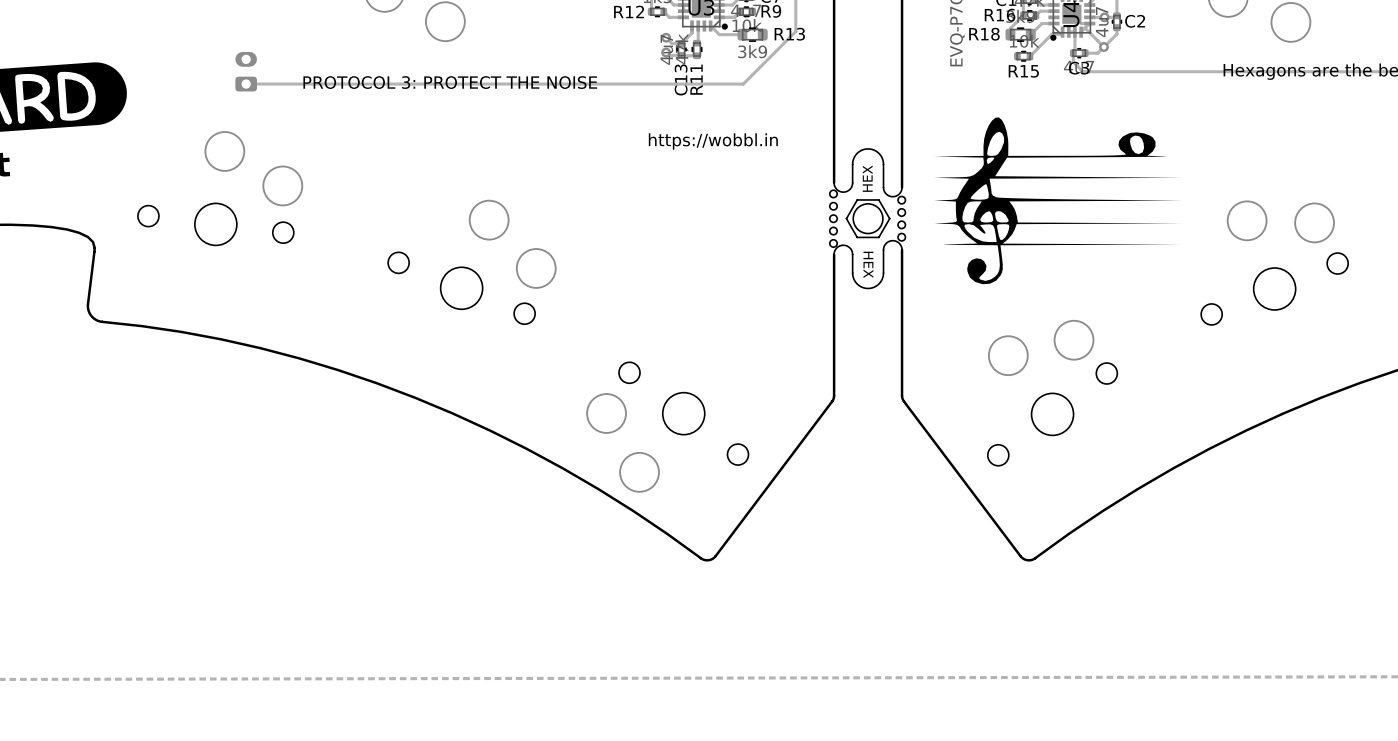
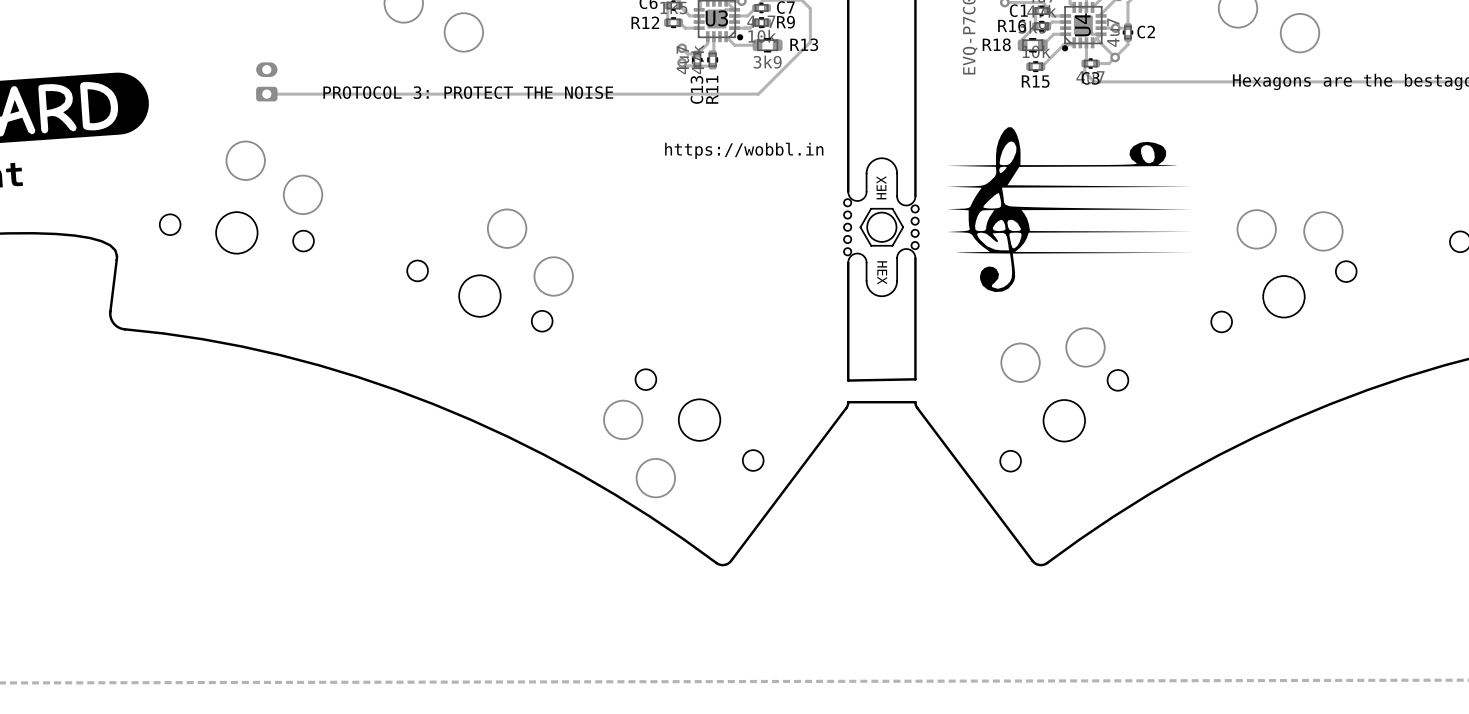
board edge: (902, 372) (902, 395) -> (915, 379) (848, 380)
board edge: (834, 373) (834, 395) -> (915, 402) (848, 402)

